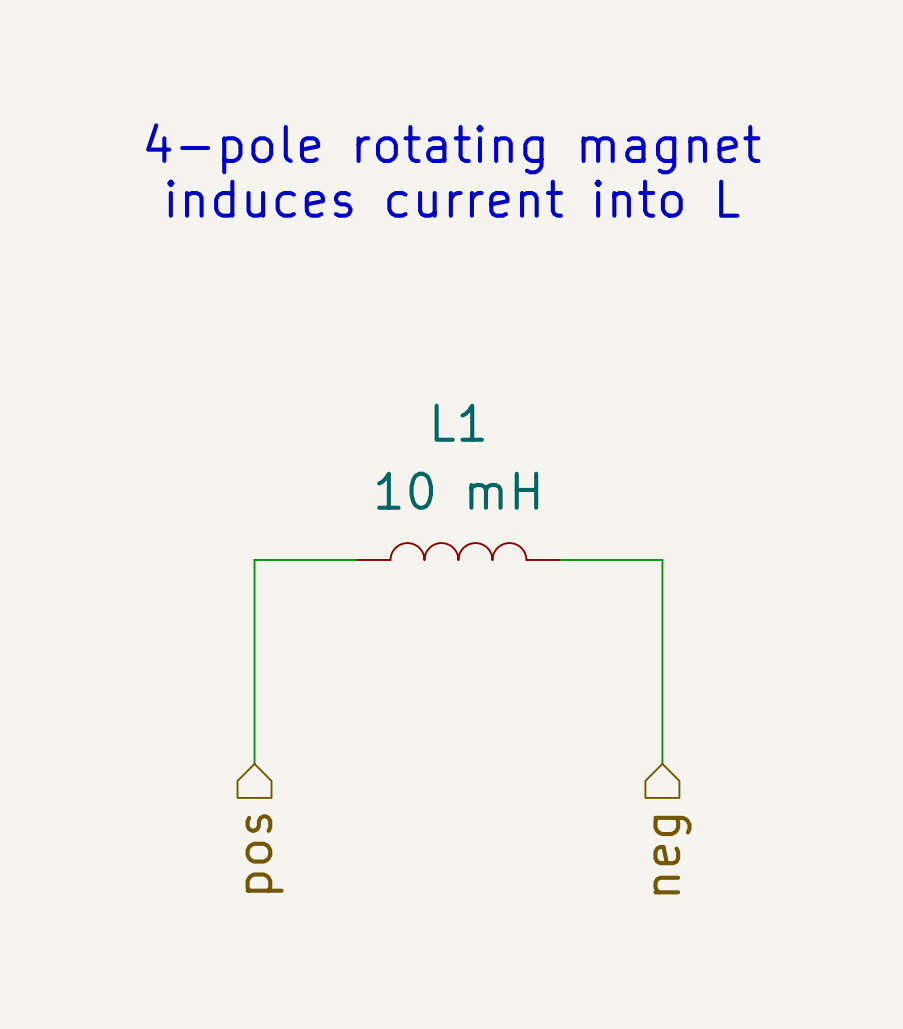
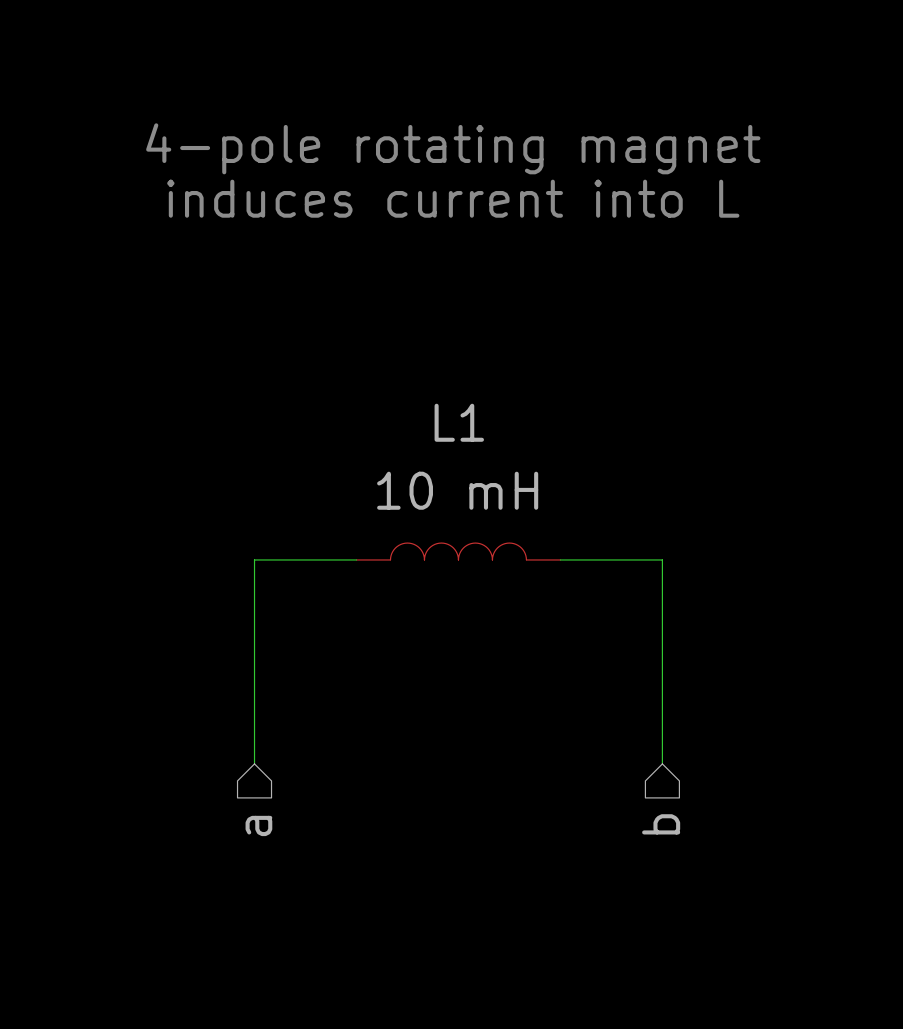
hierarchical label: pos (264, 853) -> a (258, 825)
hierarchical label: neg (672, 855) -> b (661, 824)

